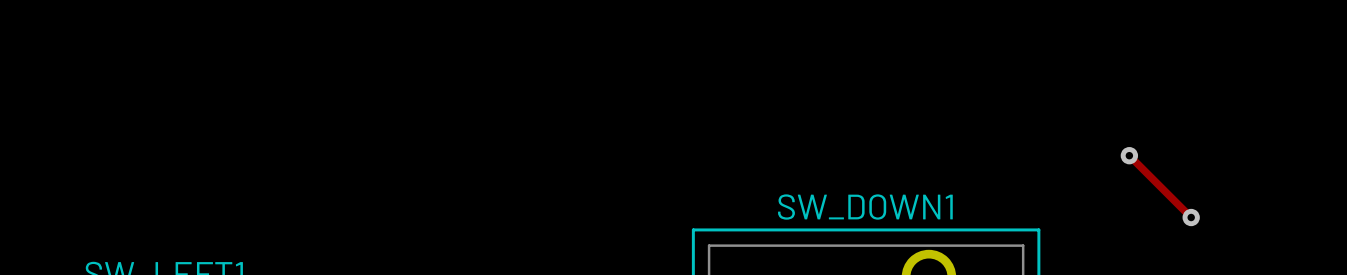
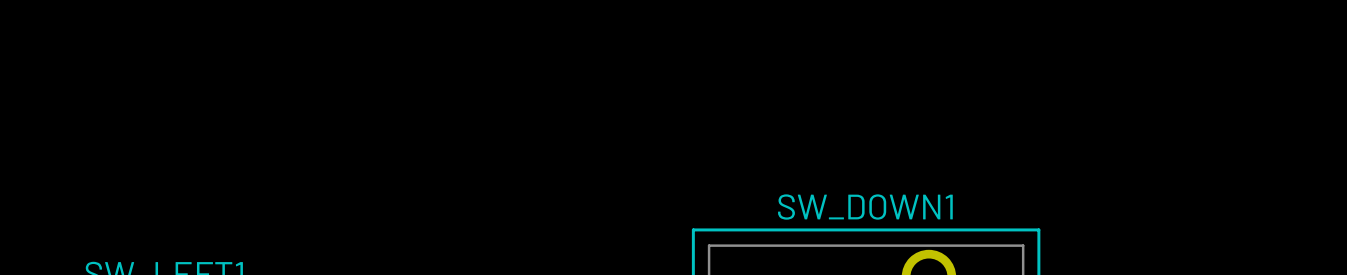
track: (1129, 155) (1191, 217) -> none
via: (1129, 155) -> none
via: (1191, 217) -> none

